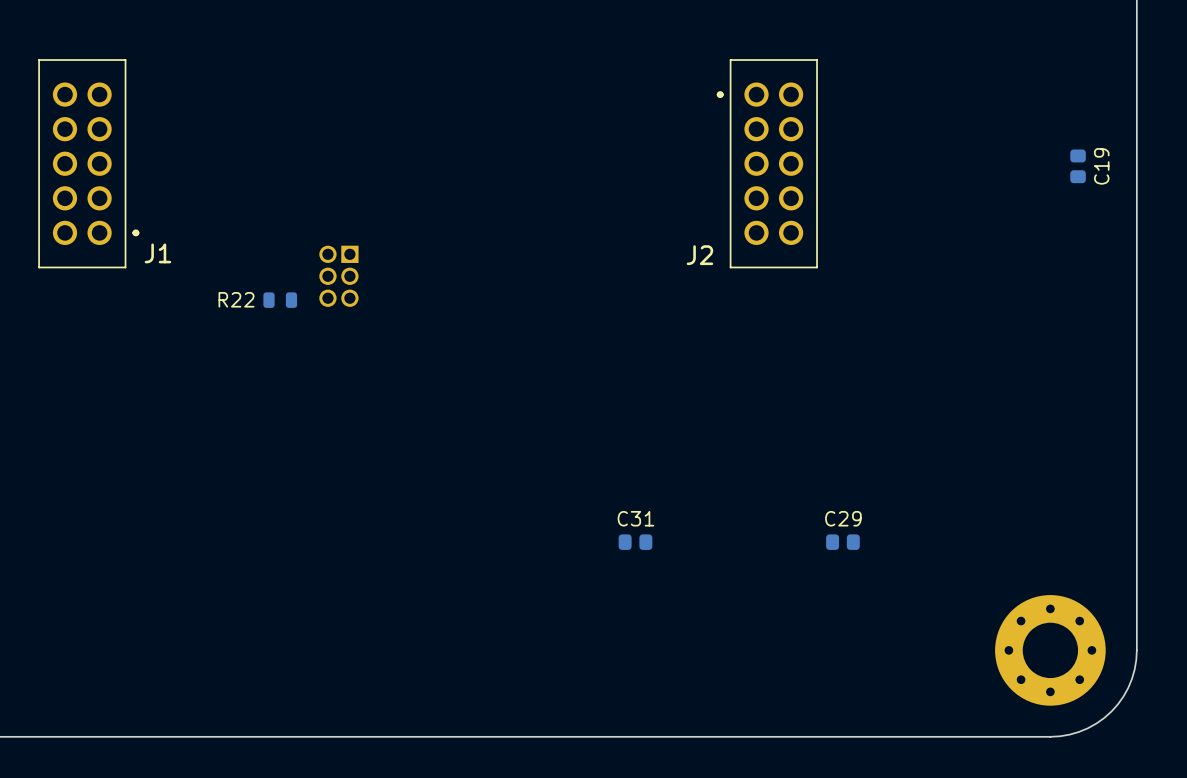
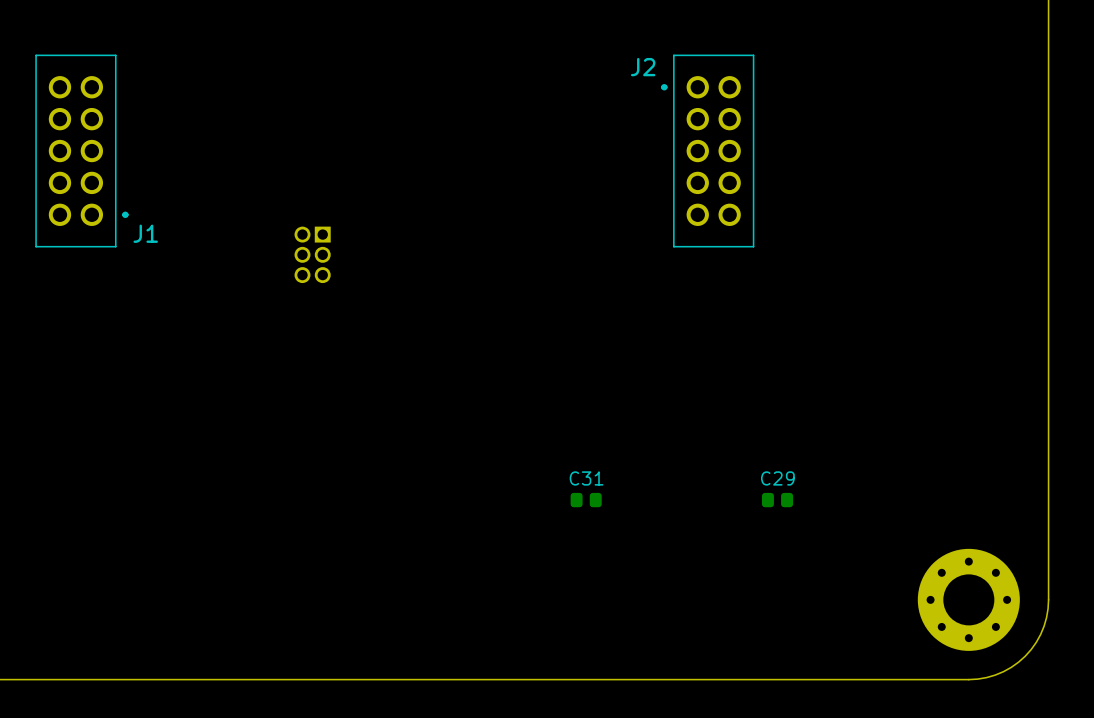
C19: (1078, 166) -> none
J2 name position: J2 (699, 255) -> J2 (643, 67)
R22: (280, 300) -> none

